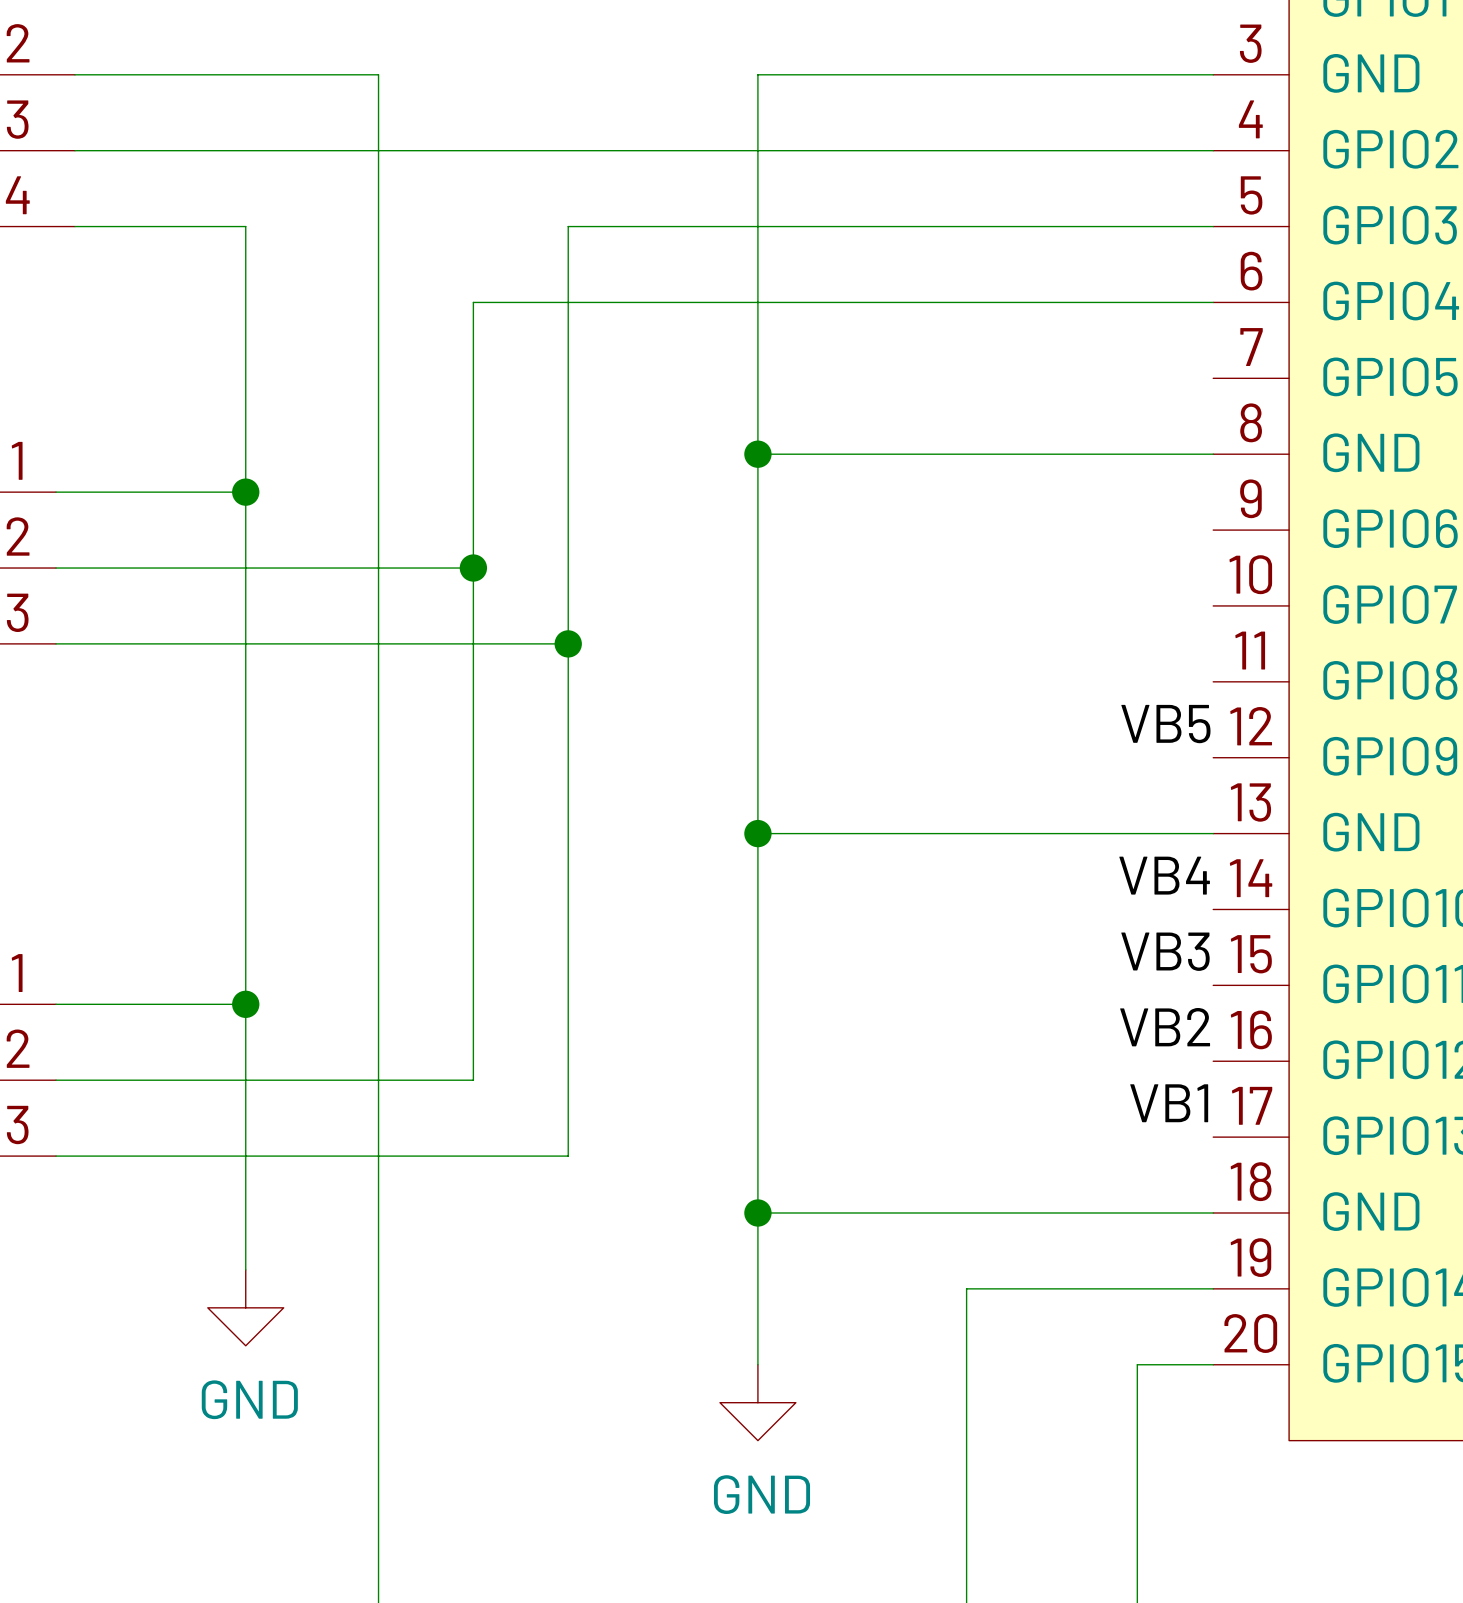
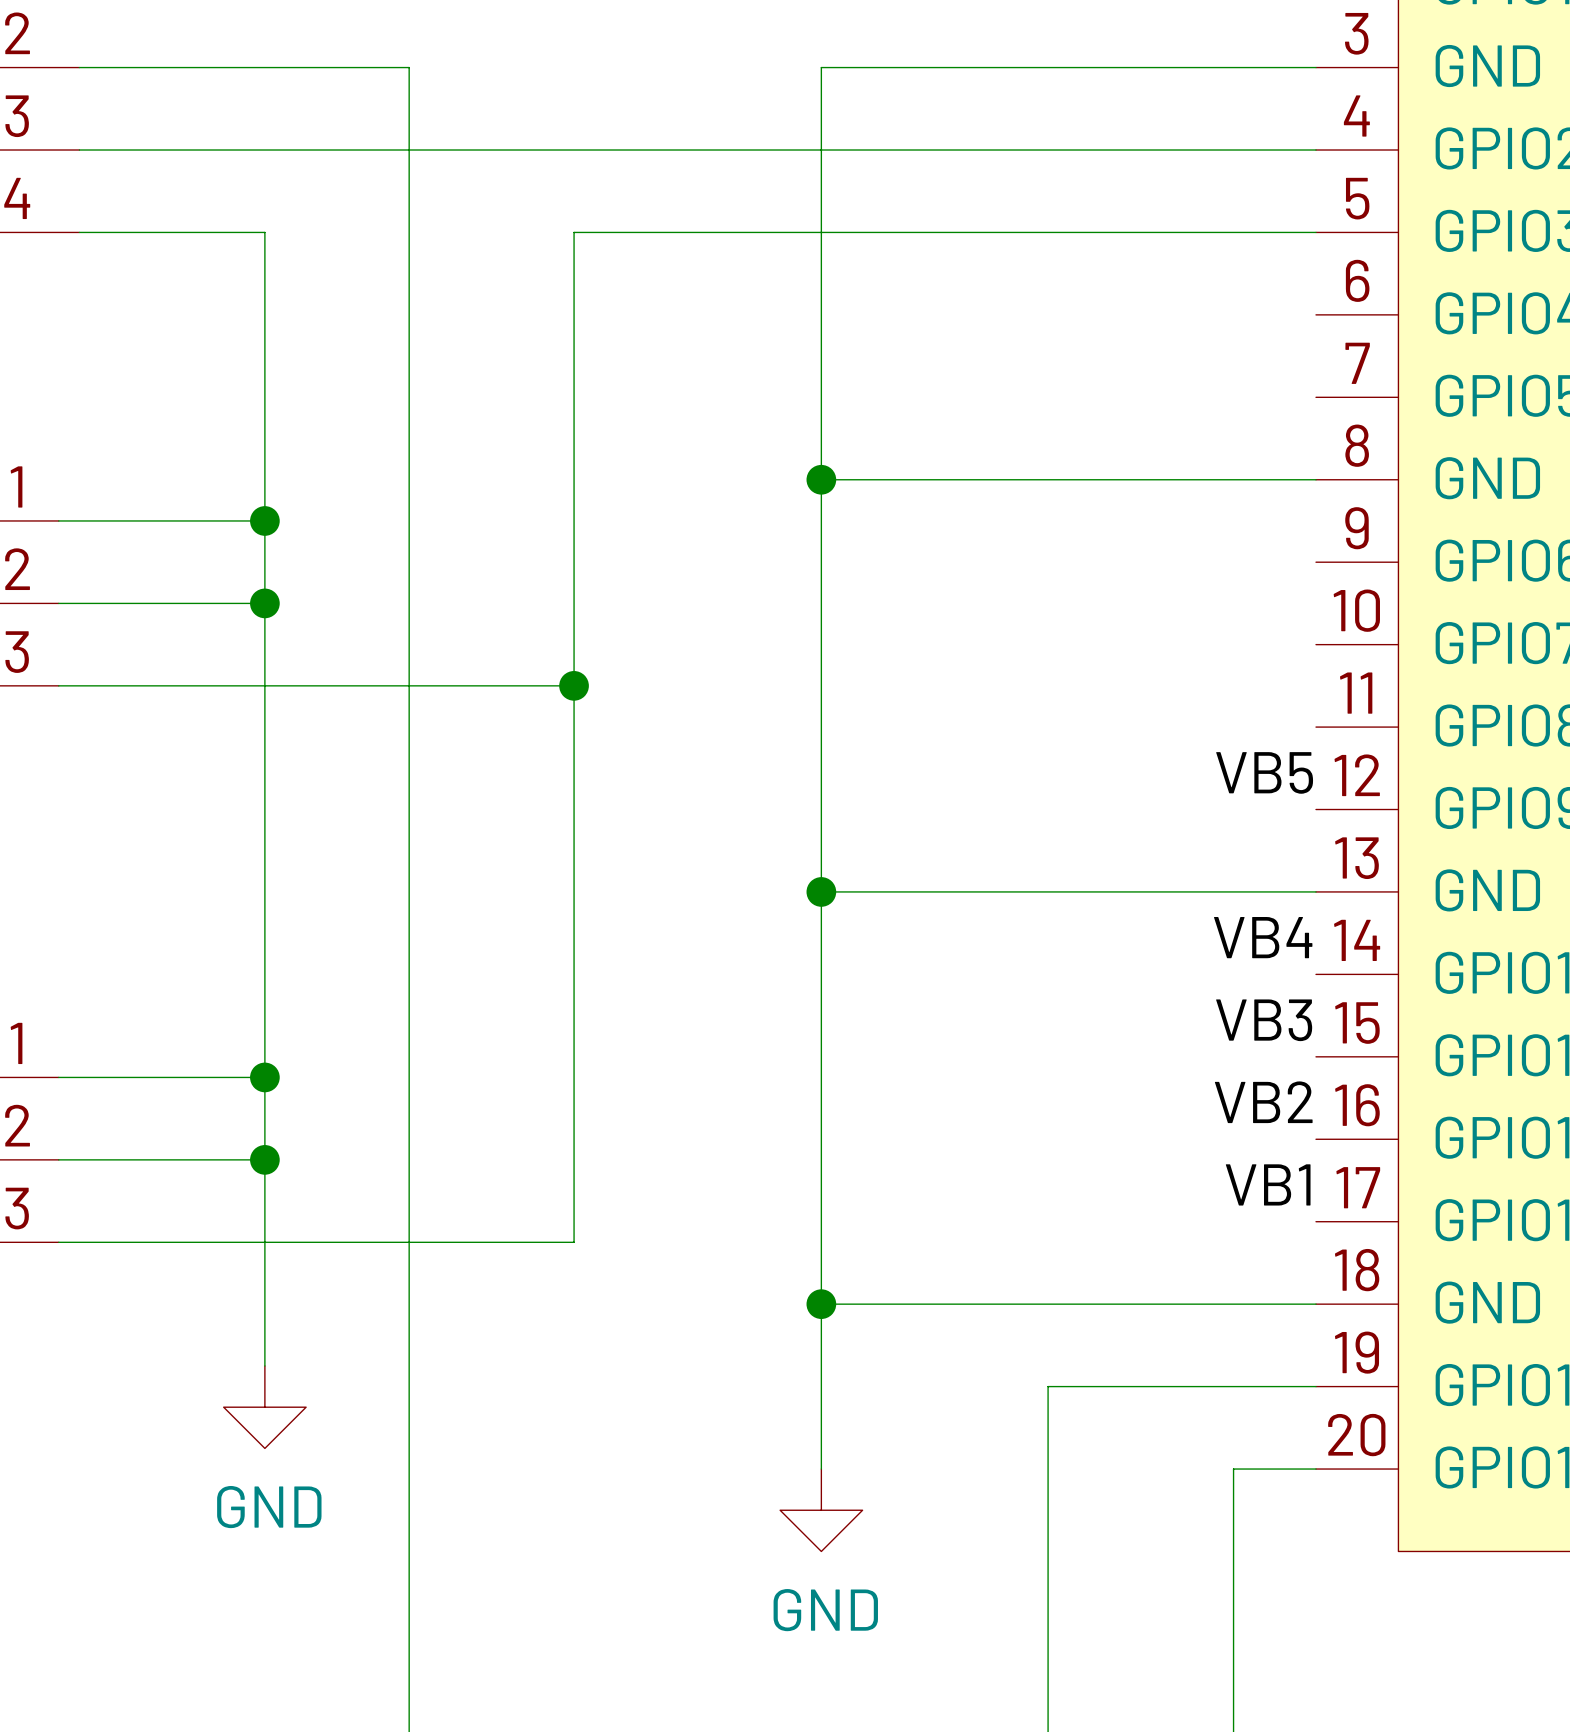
wire: (568, 226) (568, 1156) (530, 1156) -> (615, 232) (574, 232) (574, 1242)
wire: (1213, 302) (473, 302) (473, 1080) (245, 1080) -> none
wire: (245, 568) (473, 568) -> none
junction: none -> (264, 603)
junction: (473, 568) -> none
wire: (530, 643) (568, 643) -> none
junction position: (568, 643) -> (574, 685)
junction: none -> (264, 1159)

